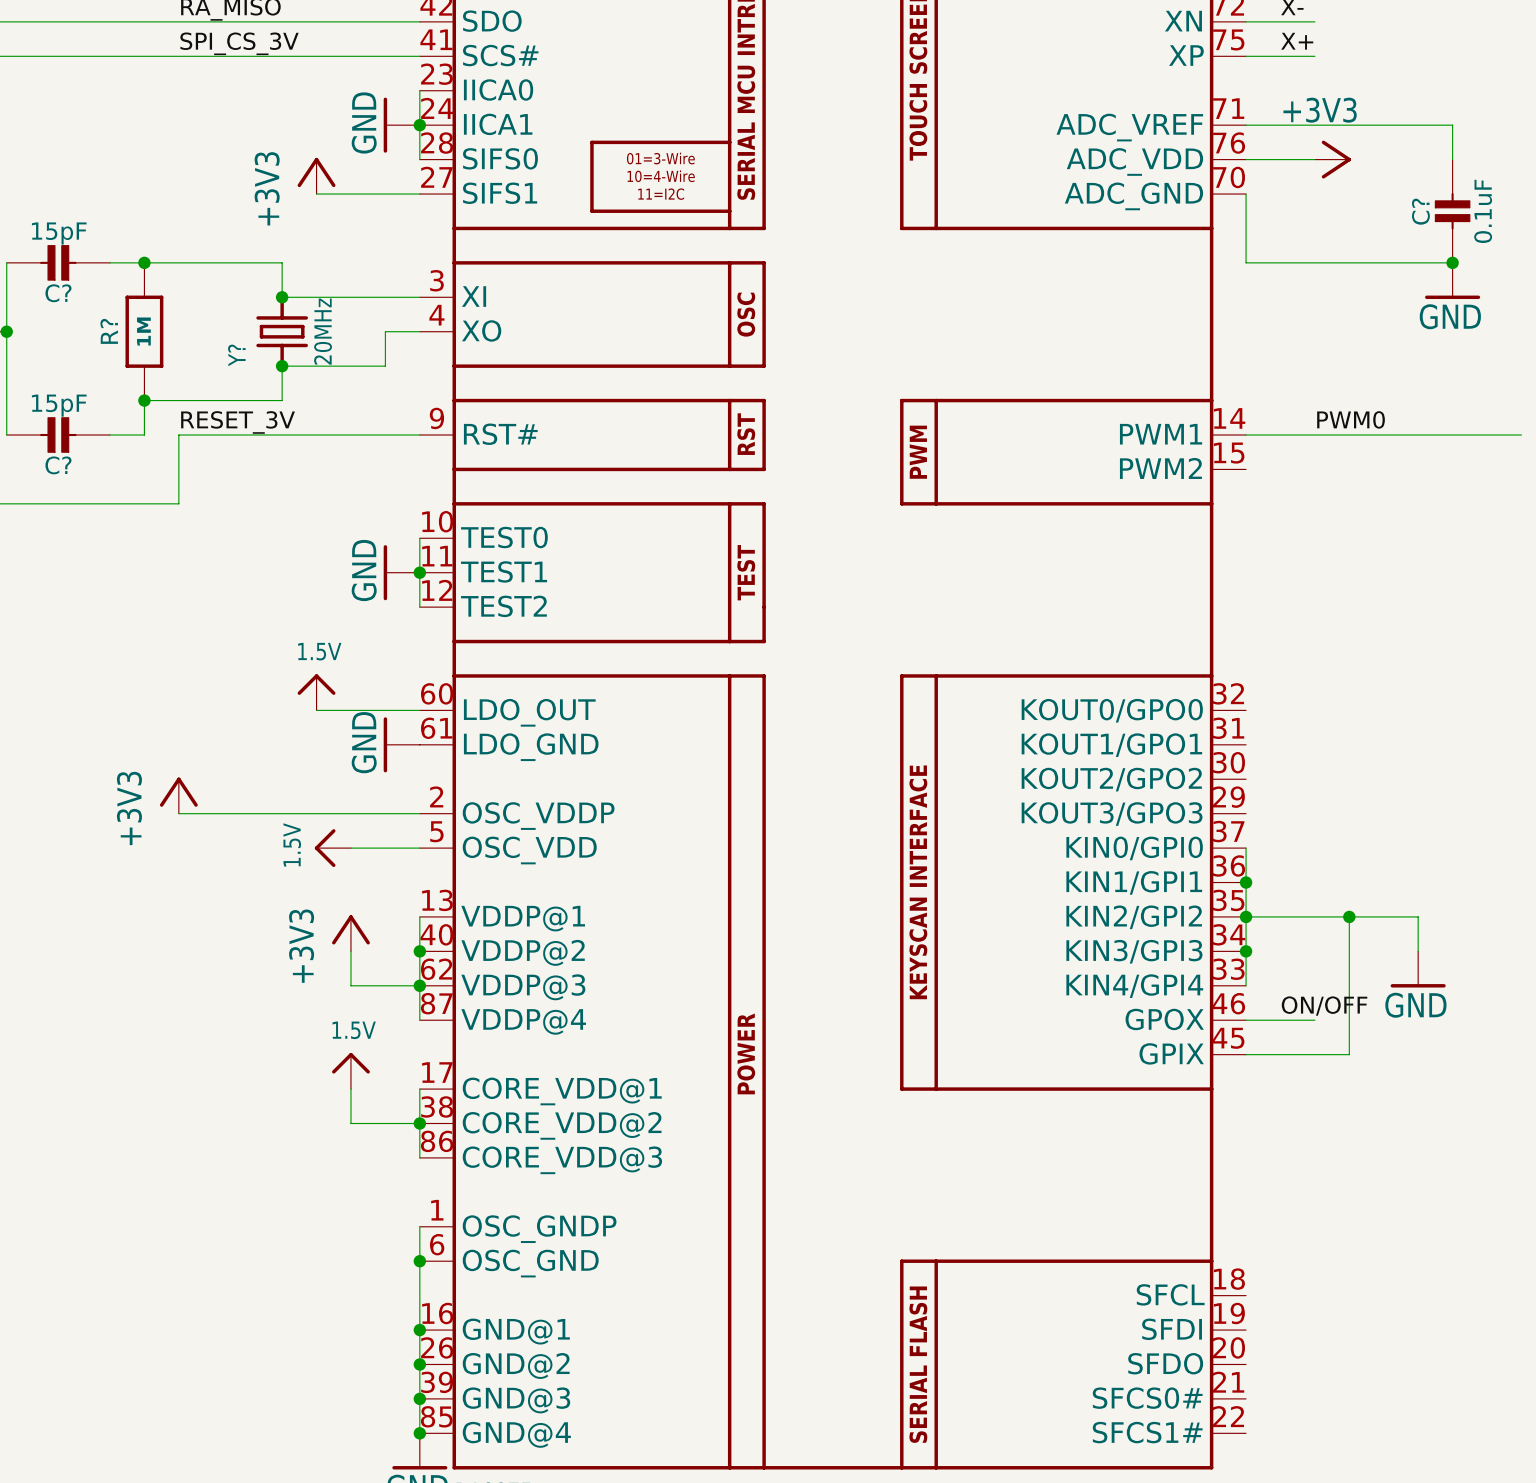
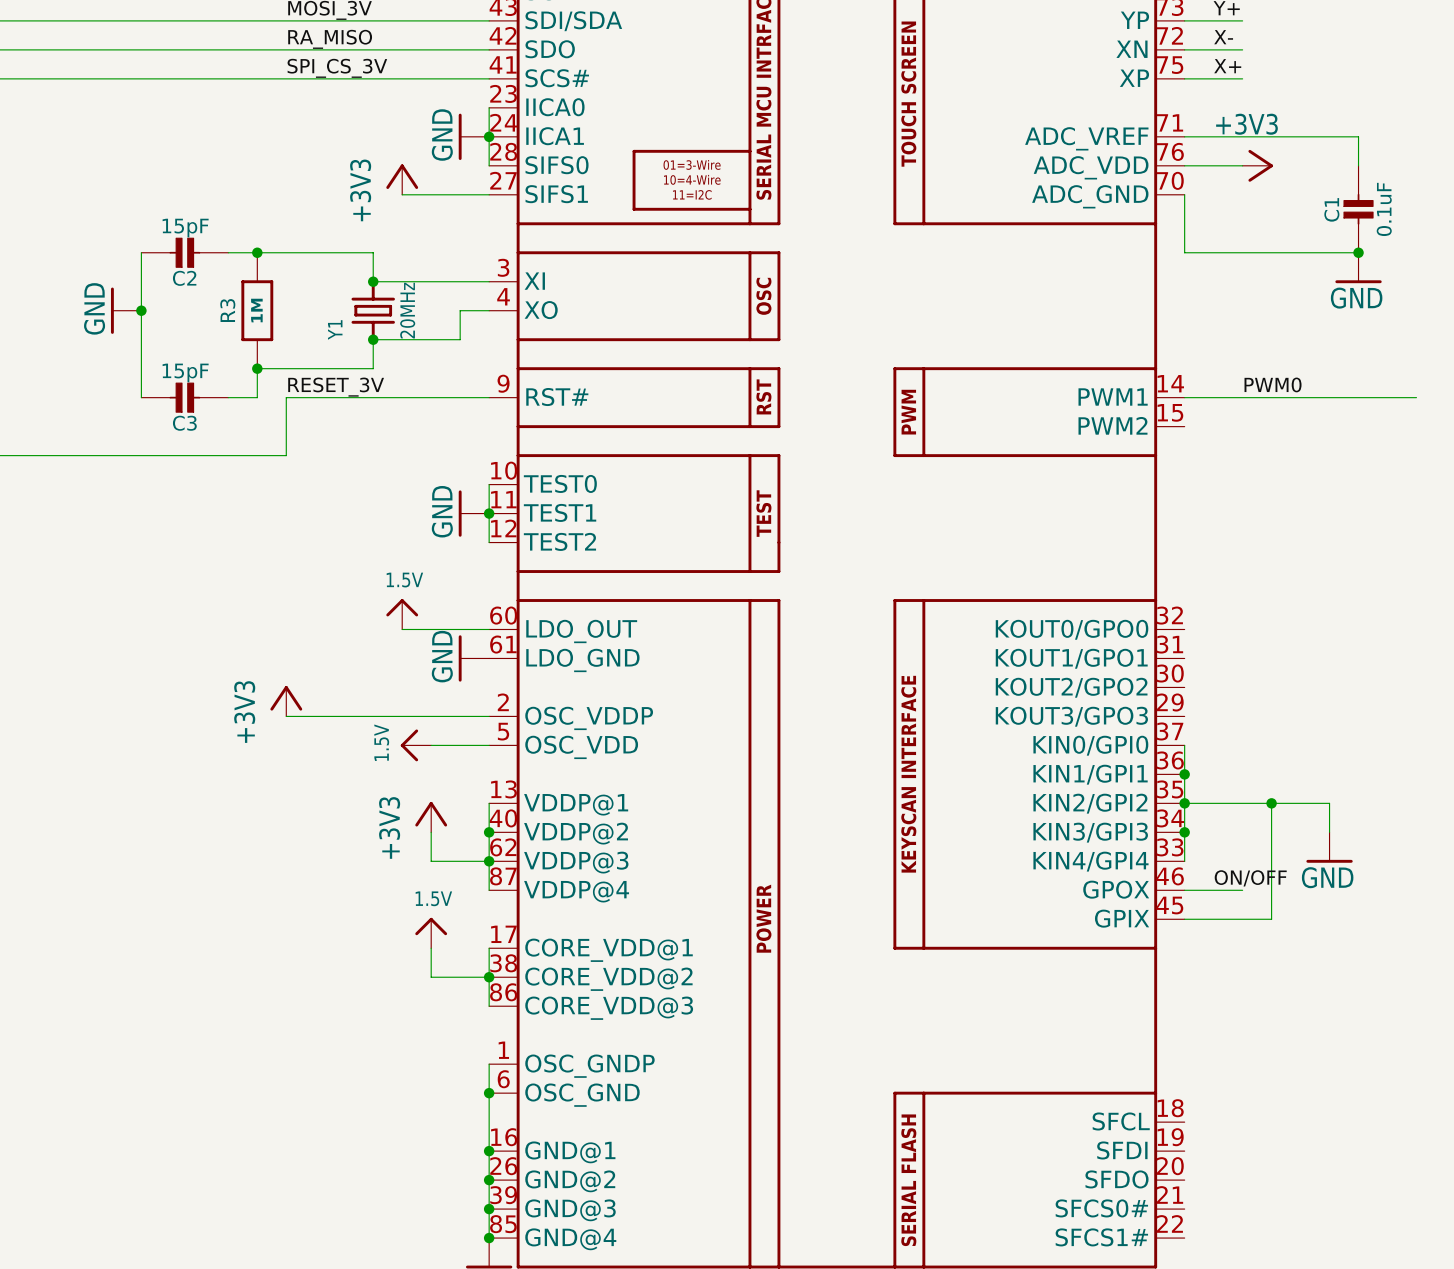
C? name: C? (1420, 211) -> C1 (1331, 209)
C? name: C? (58, 293) -> C2 (184, 278)
R? name: R? (109, 331) -> R3 (227, 310)
Y? name: Y? (236, 355) -> Y1 (335, 329)
C? name: C? (58, 465) -> C3 (184, 423)

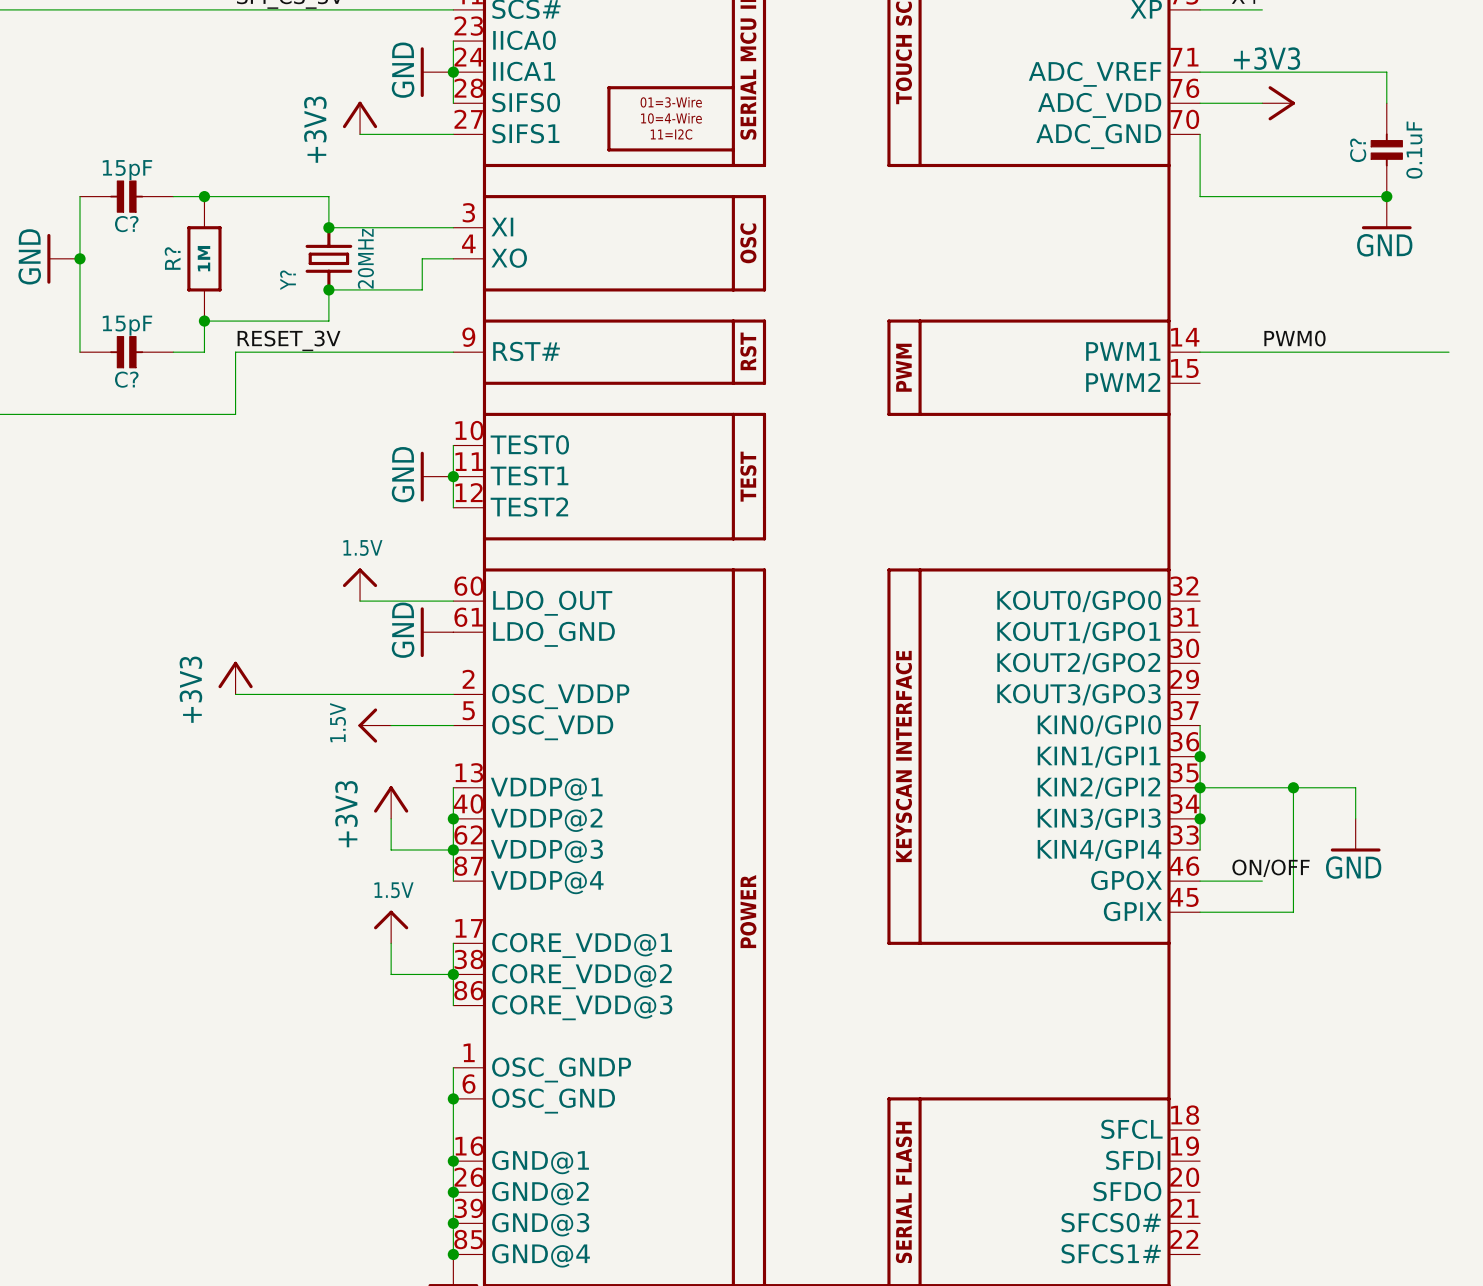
C1 name: C1 (1331, 209) -> C? (1358, 150)
C2 name: C2 (184, 278) -> C? (126, 224)
R3 name: R3 (227, 310) -> R? (172, 258)
Y1 name: Y1 (335, 329) -> Y? (287, 280)
C3 name: C3 (184, 423) -> C? (126, 379)

